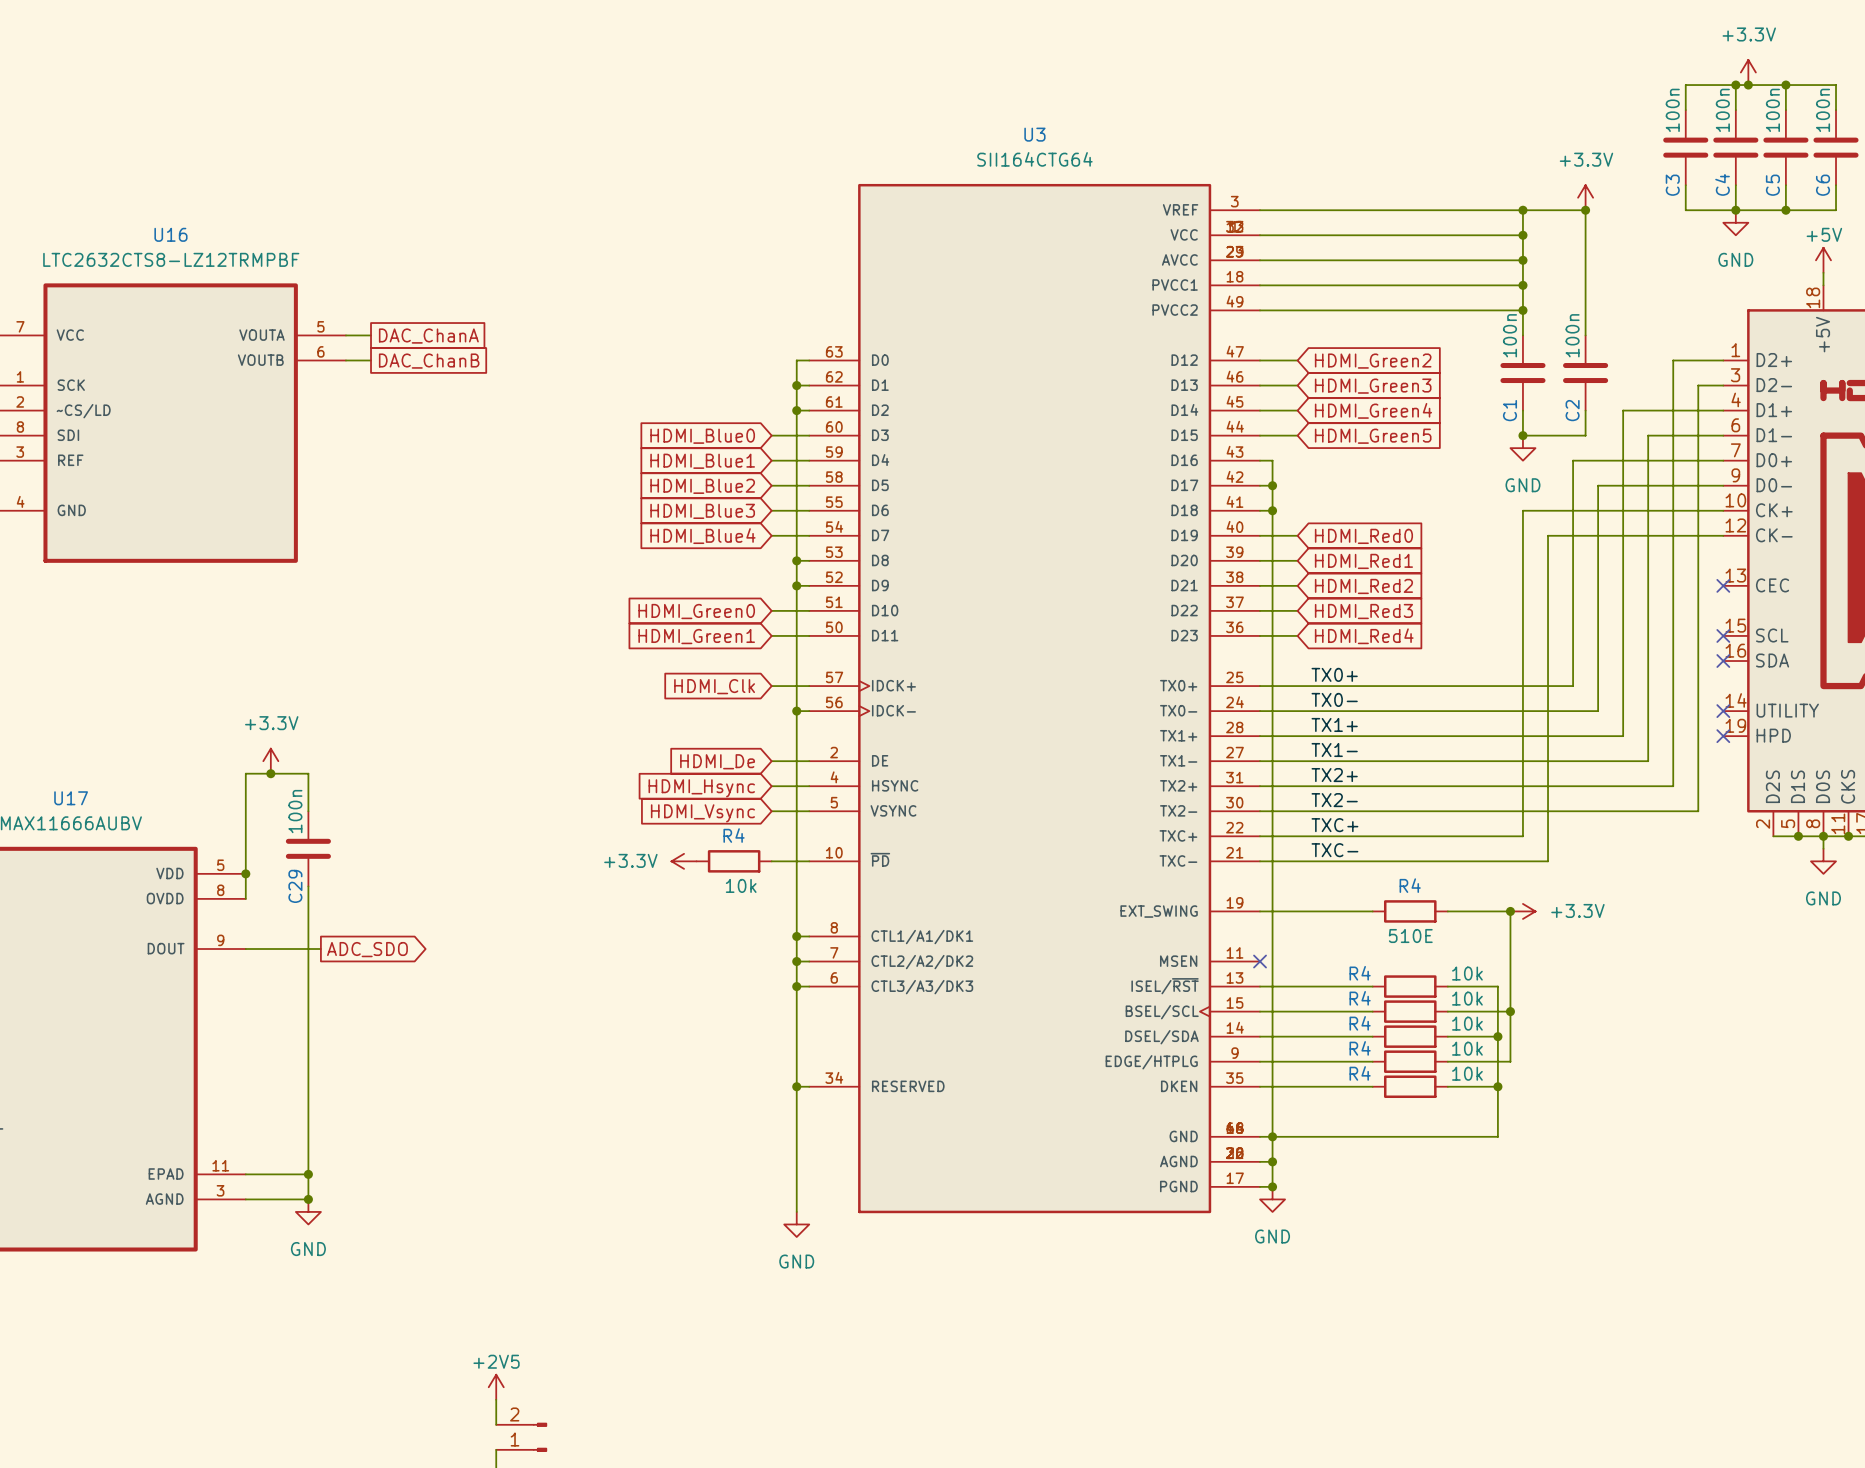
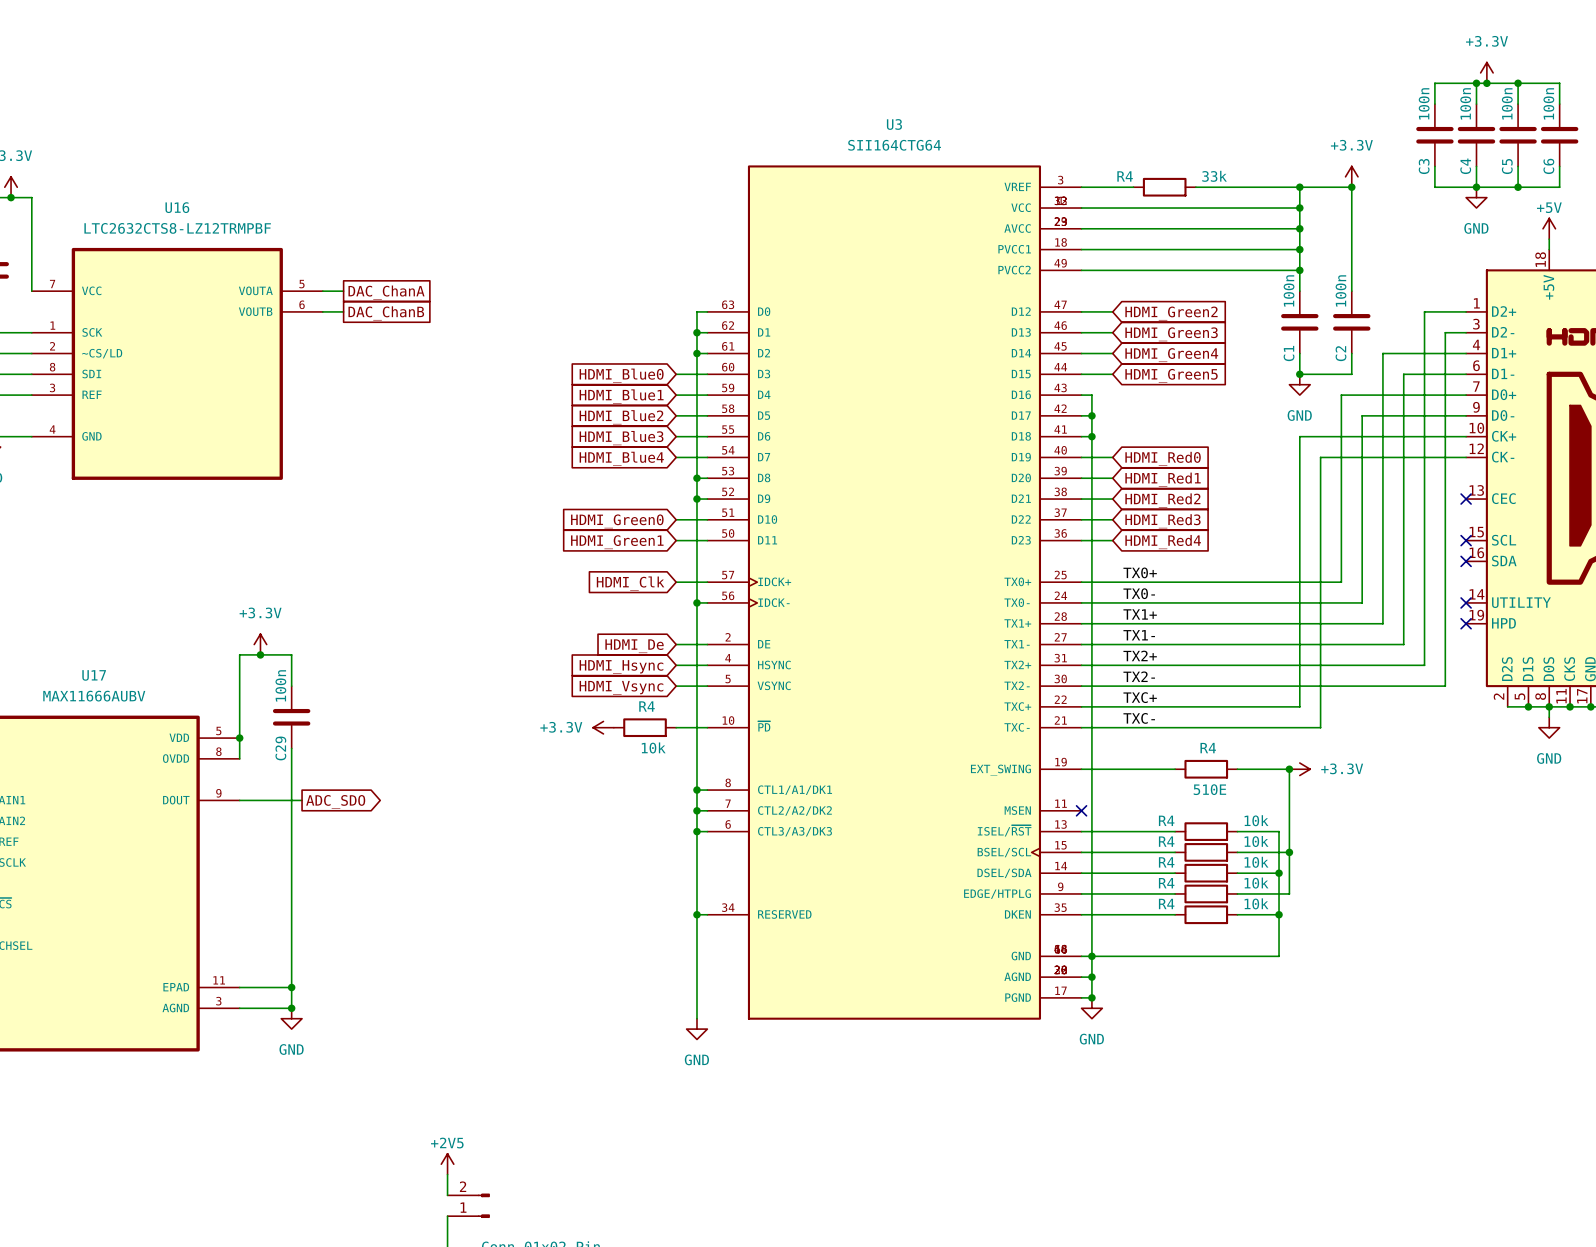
wire: (1322, 210) (1397, 210) -> none
R4: none -> 33k (1164, 187)

